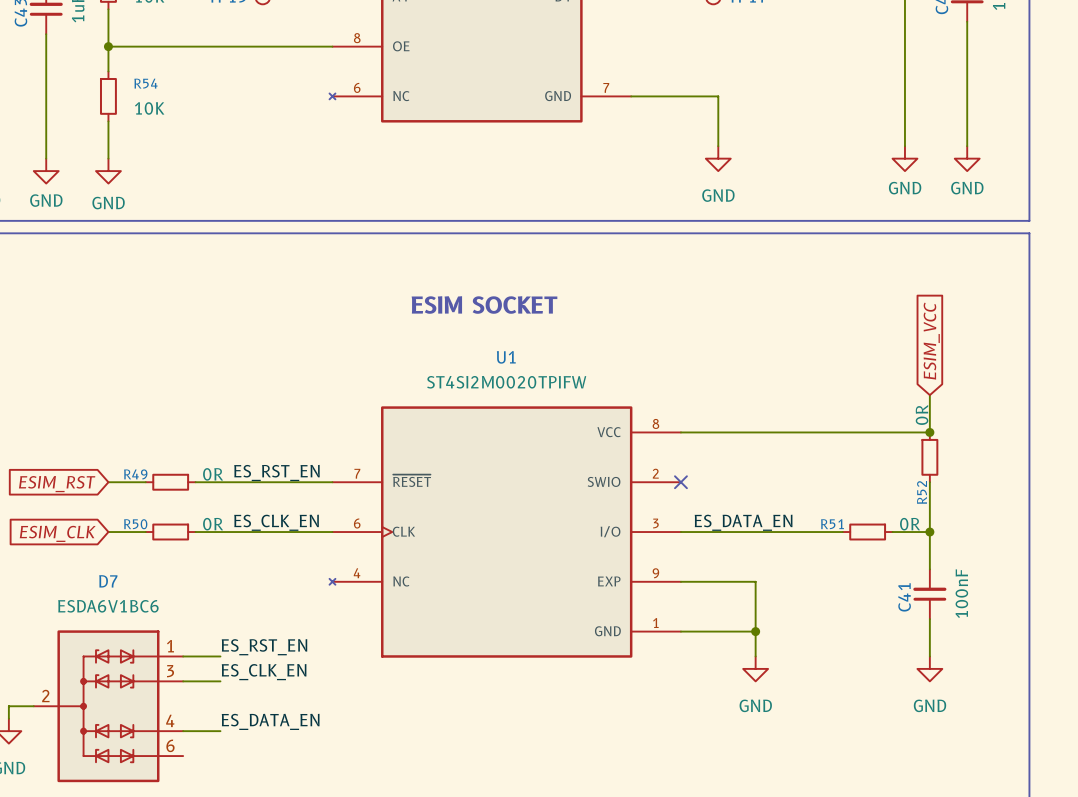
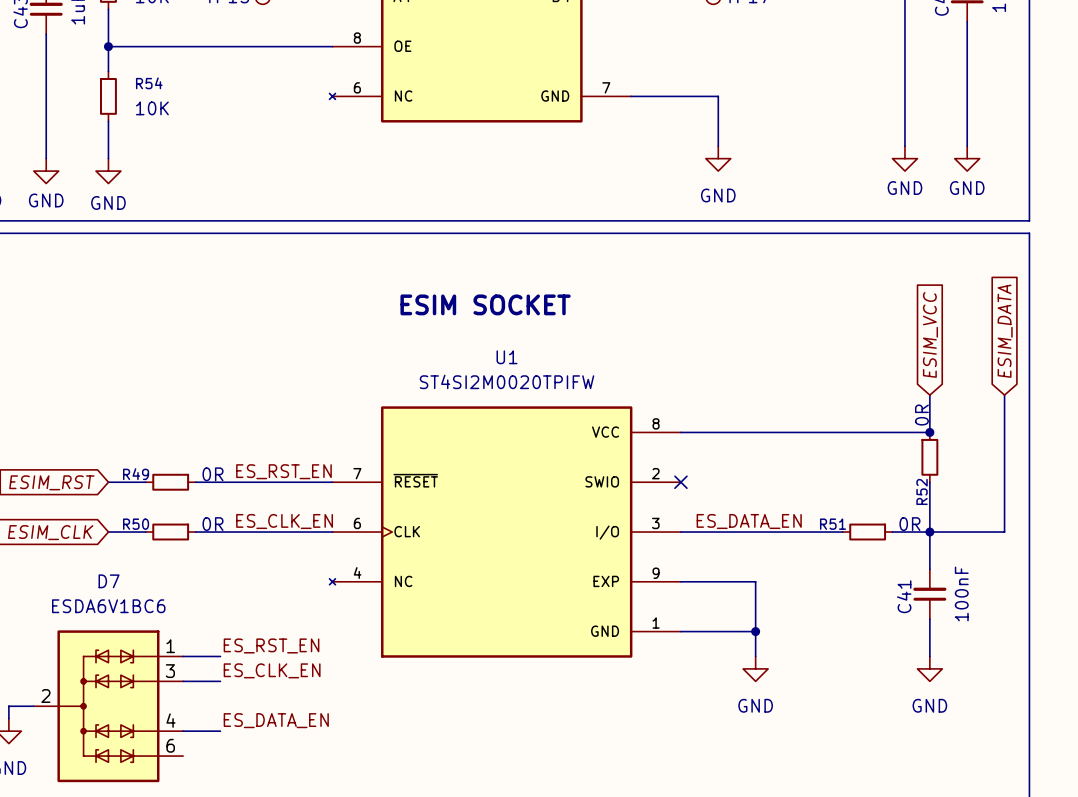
global label: none -> ESIM_DATA (1005, 331)
wire: none -> (1004, 395) (1004, 532) (929, 532)

